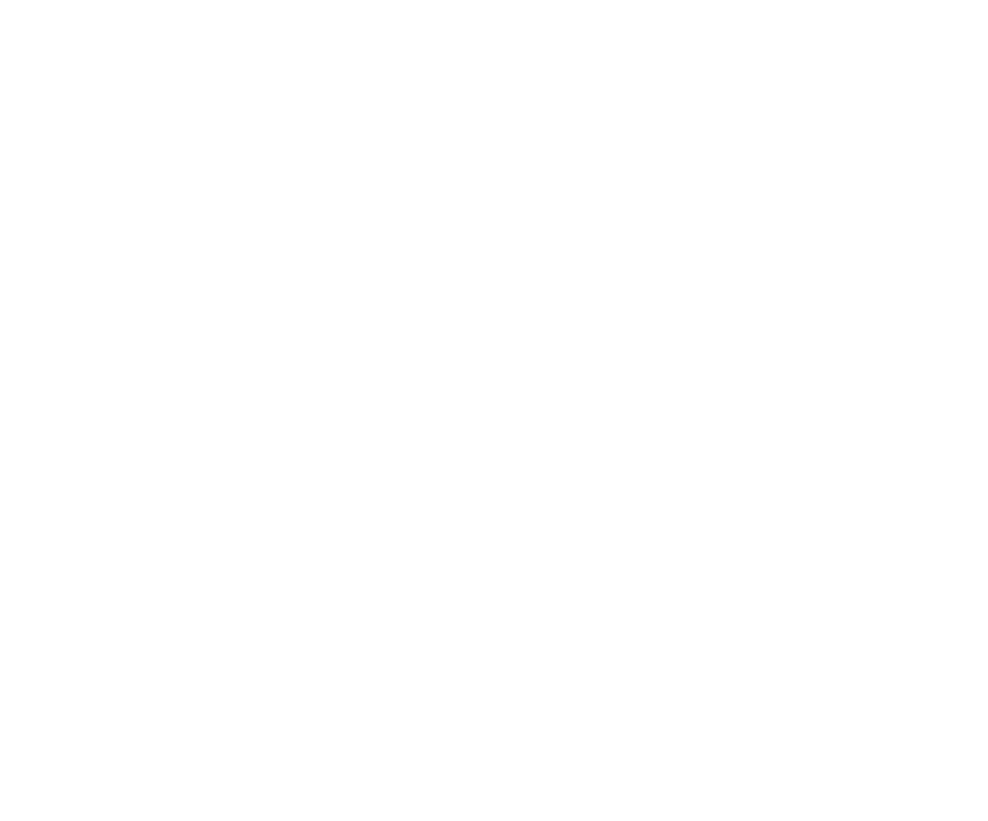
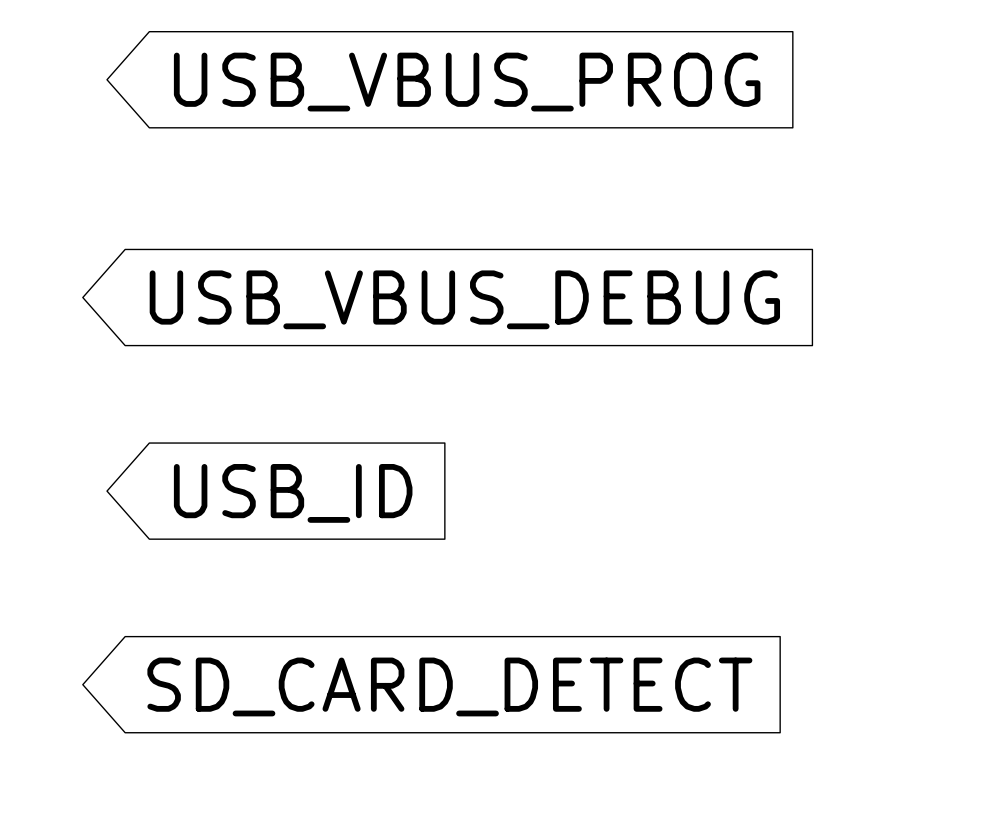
global label: none -> USB_VBUS_PROG (467, 82)
global label: none -> USB_VBUS_DEBUG (464, 299)
global label: none -> USB_ID (293, 493)
global label: none -> SD_CARD_DETECT (449, 686)

